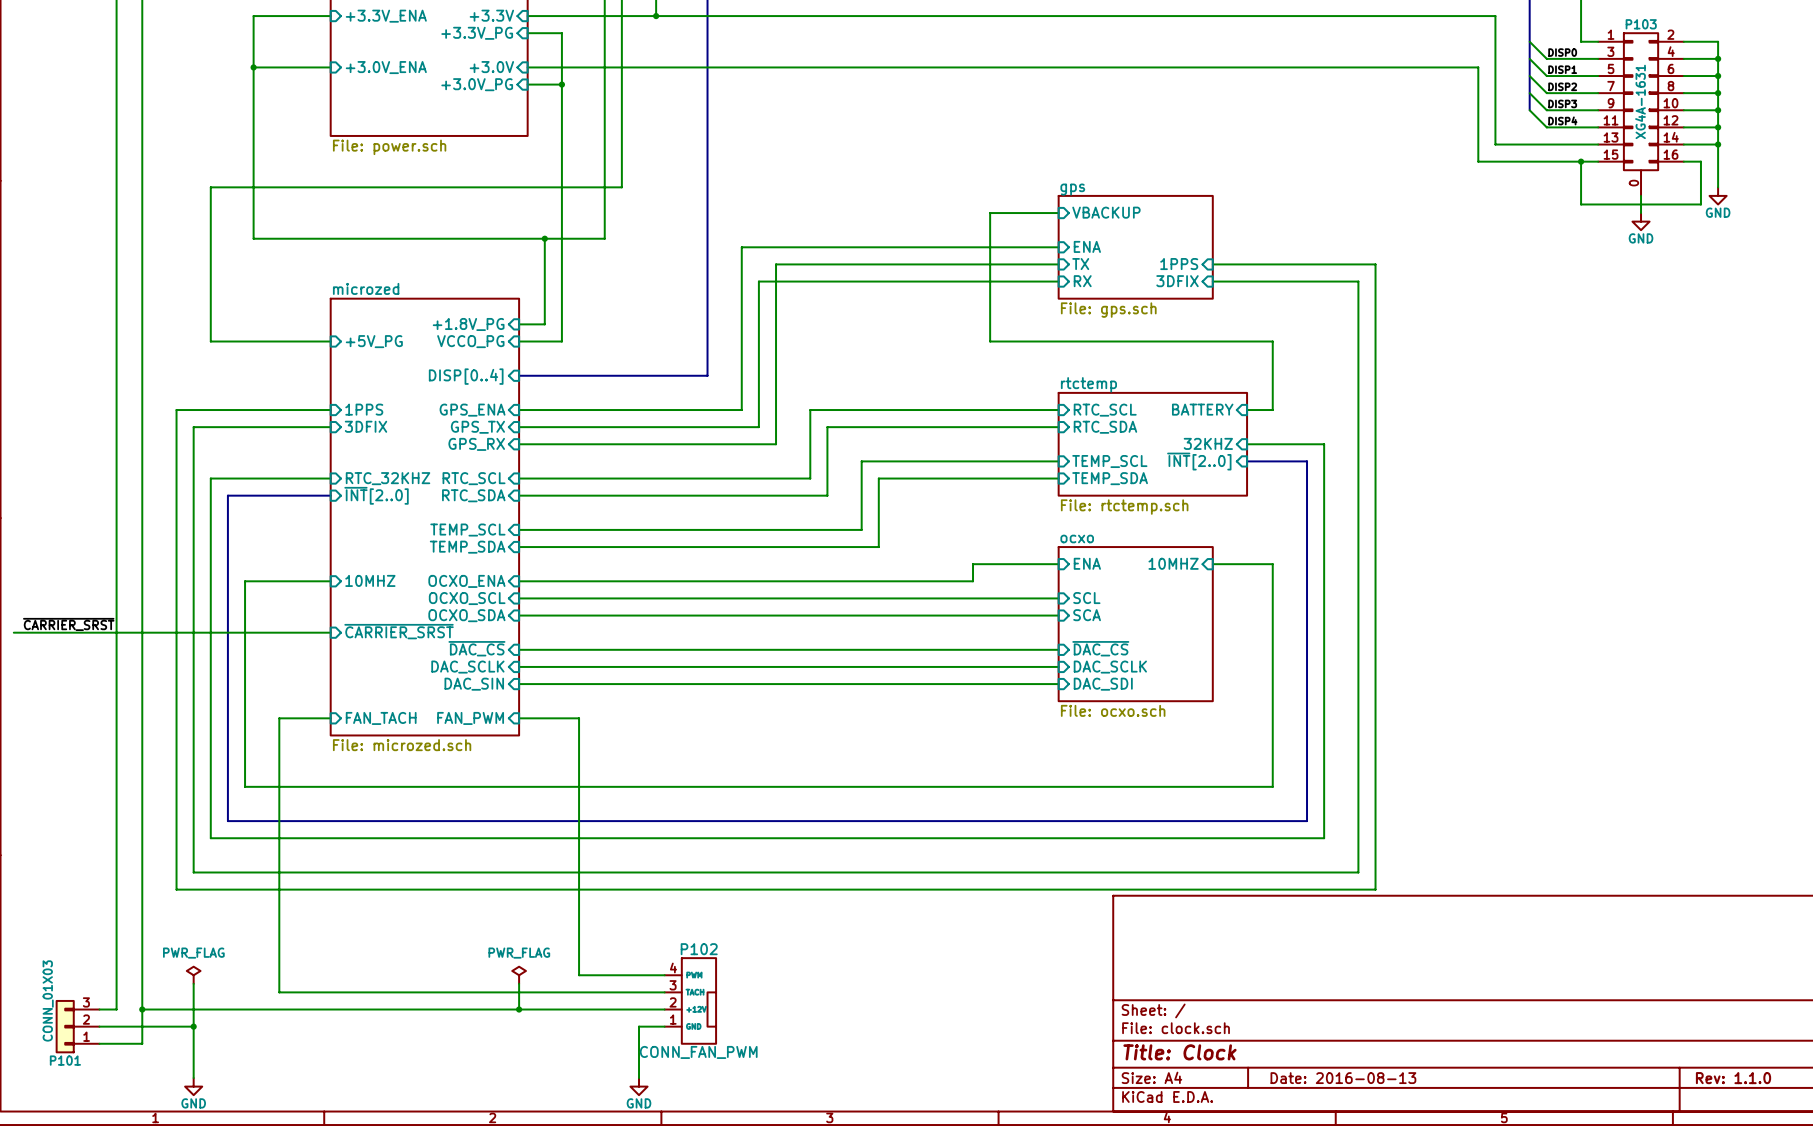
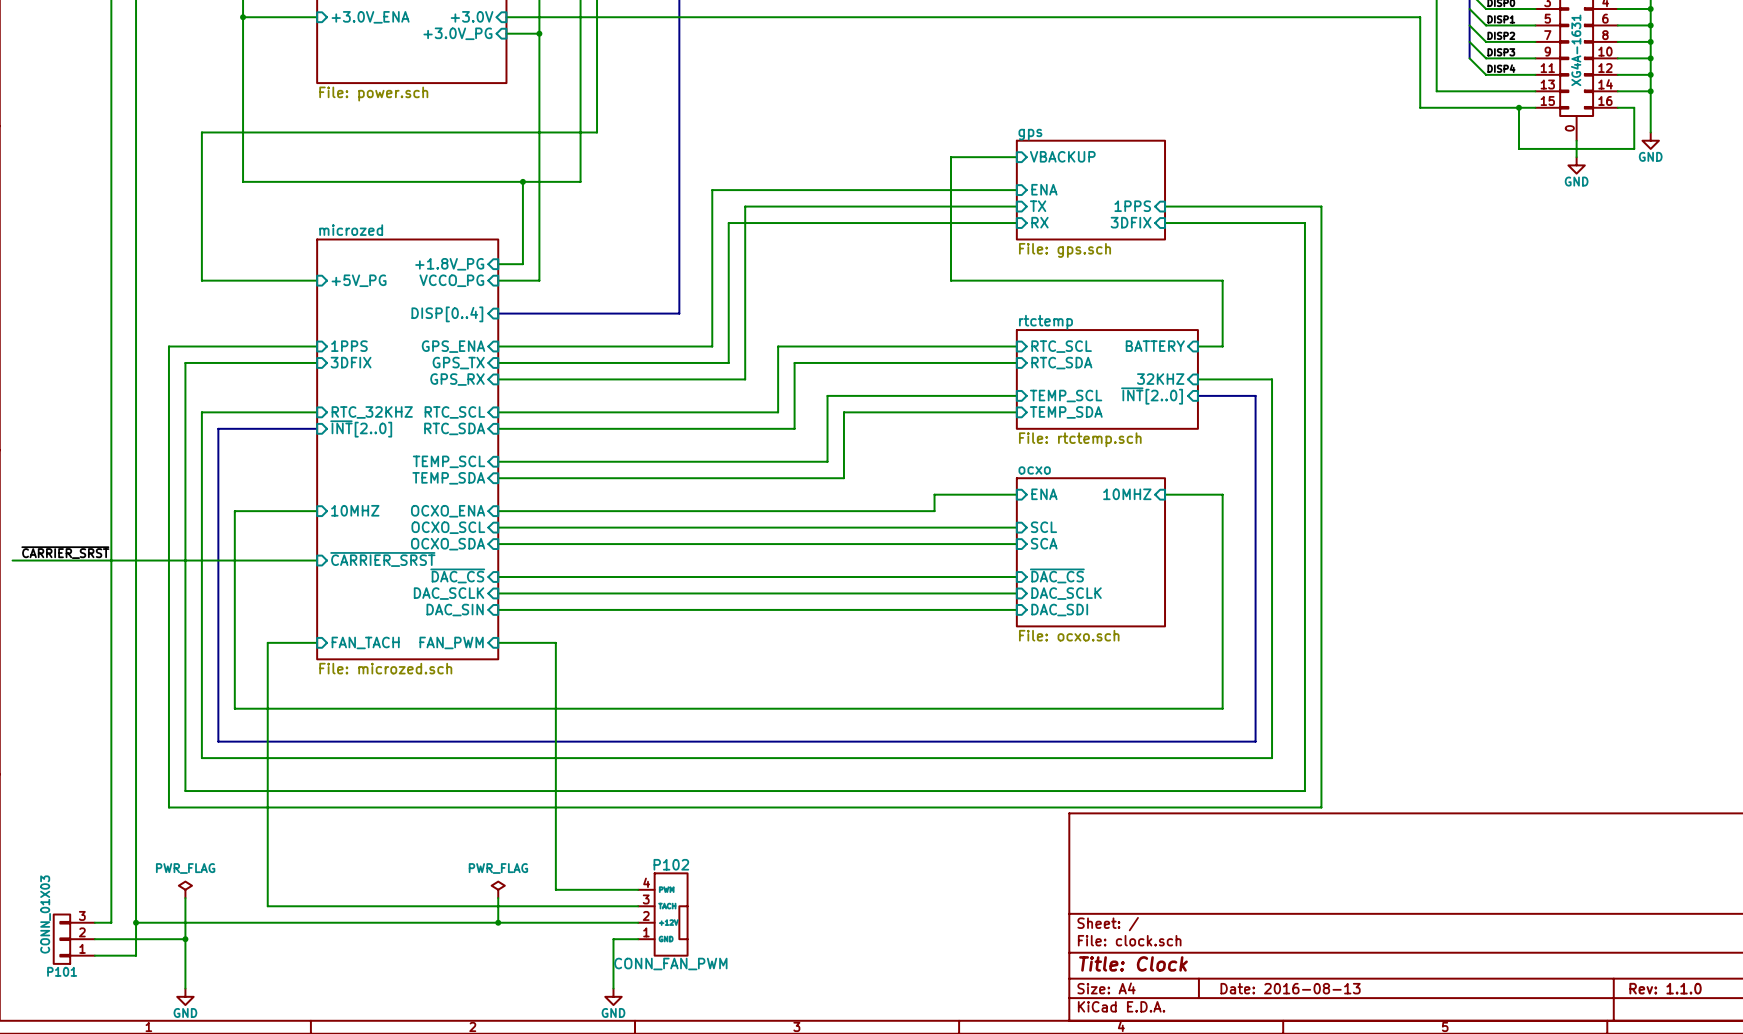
P101 symbol: [55, 1000, 100, 1054] -> [53, 914, 95, 964]

